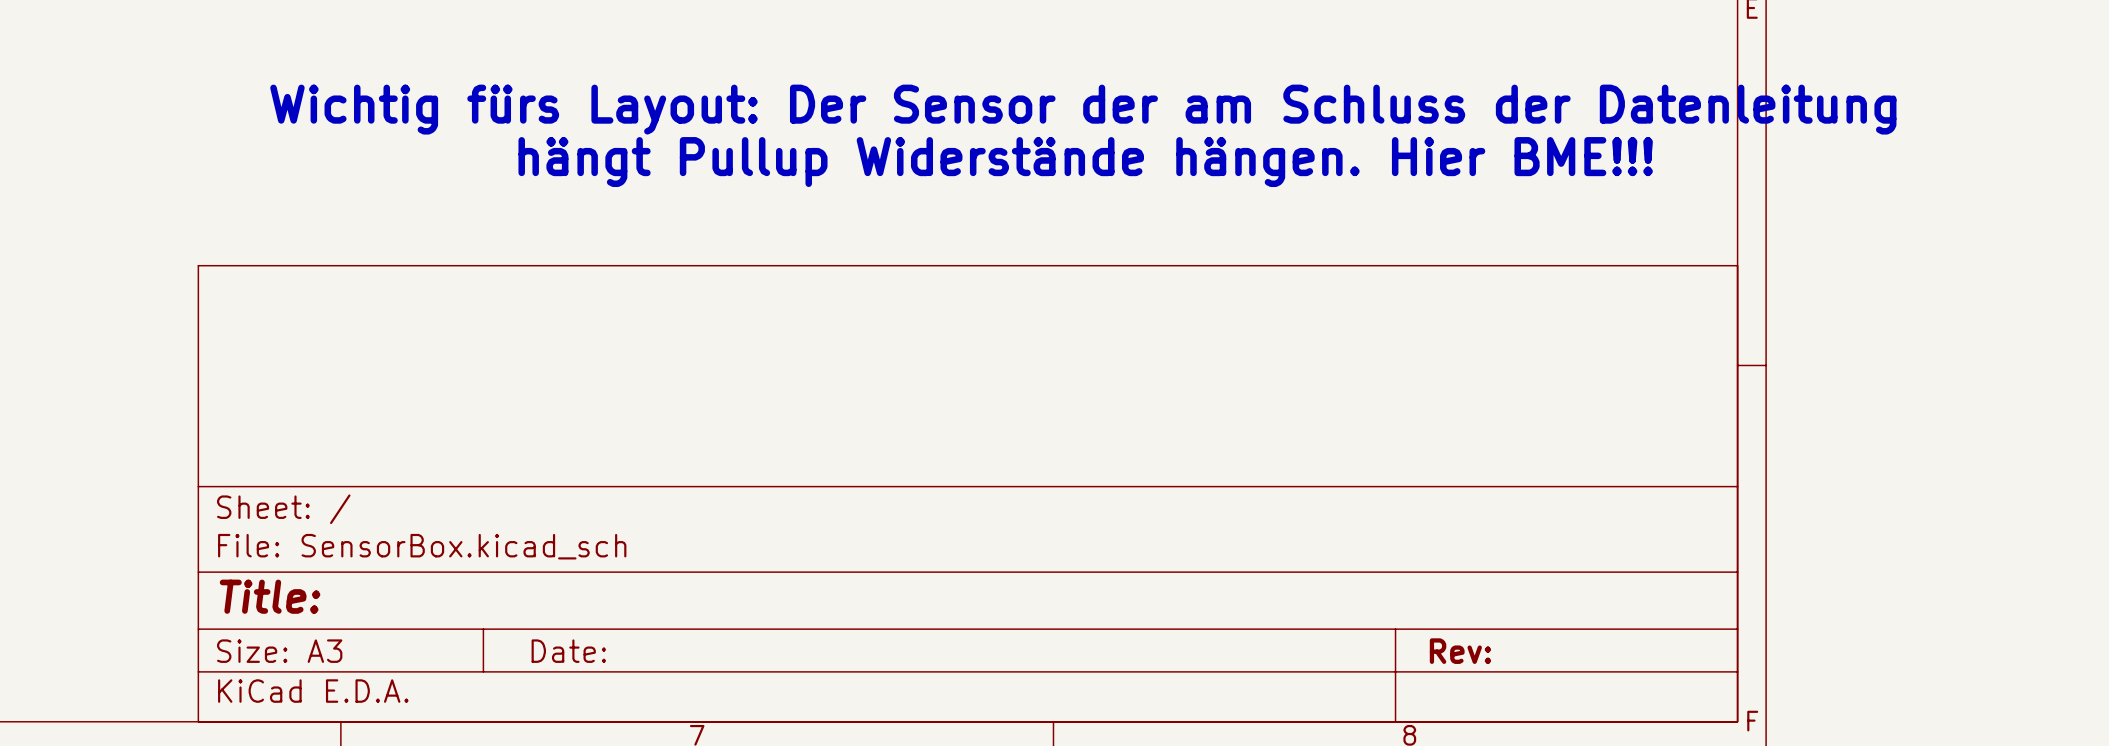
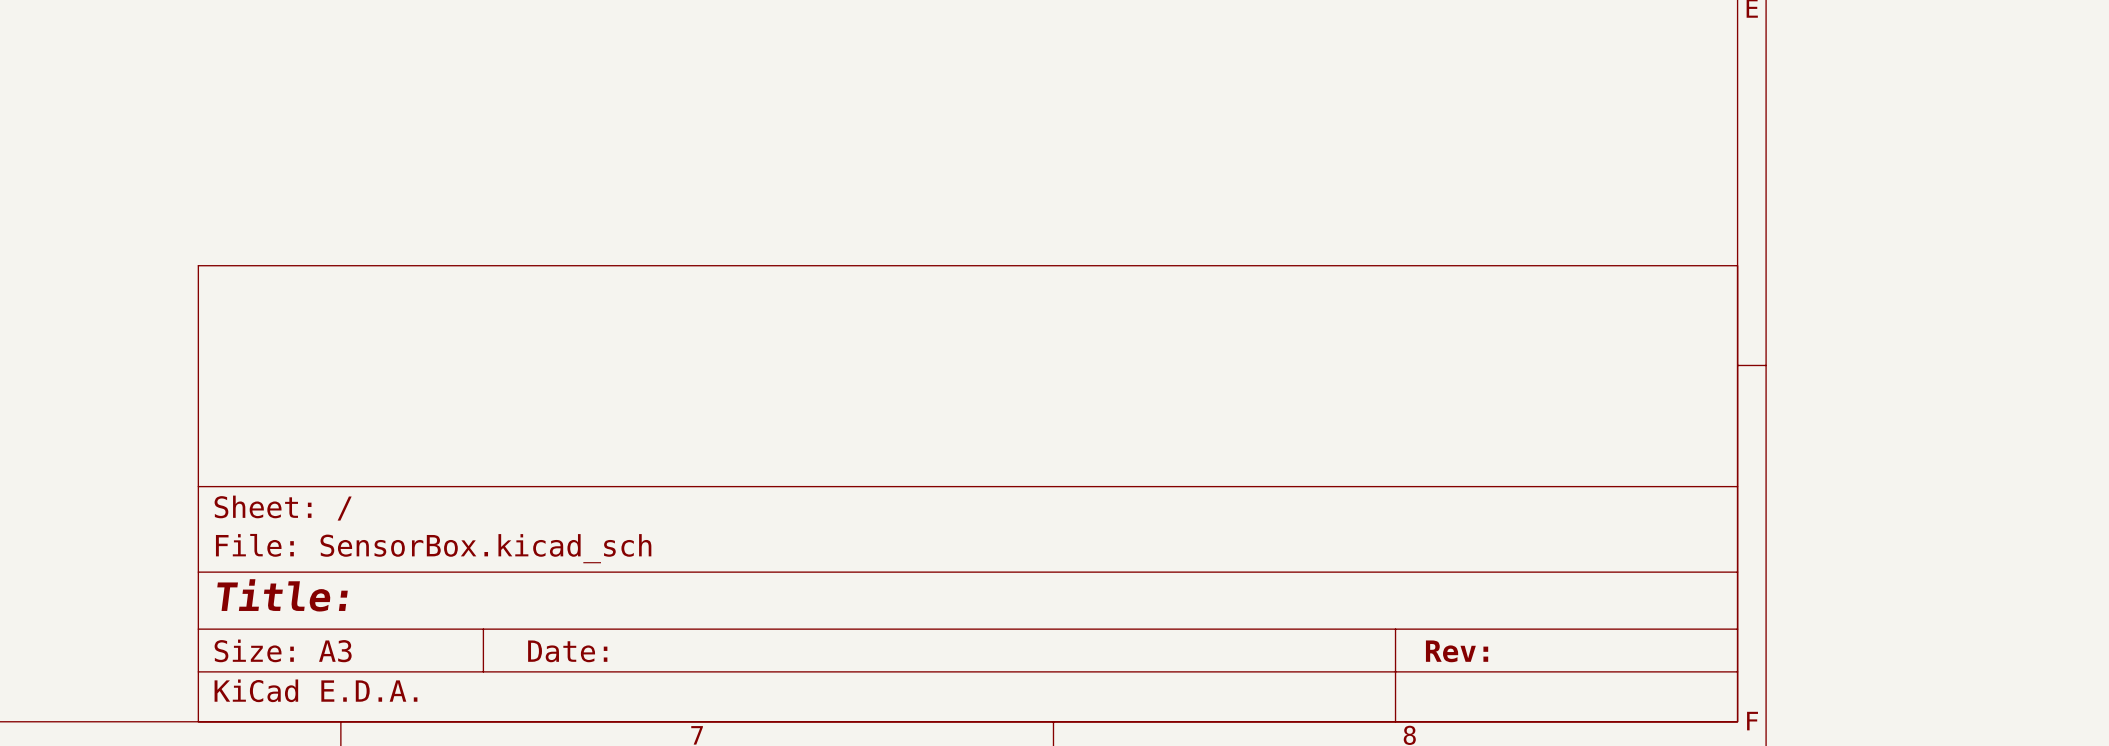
text: Wichtig fürs Layout: Der Sensor der am Schluss der Datenleitung (1083, 109) -> none
text: hängt Pullup Widerstände hängen. Hier BME!!! (1085, 162) -> none

